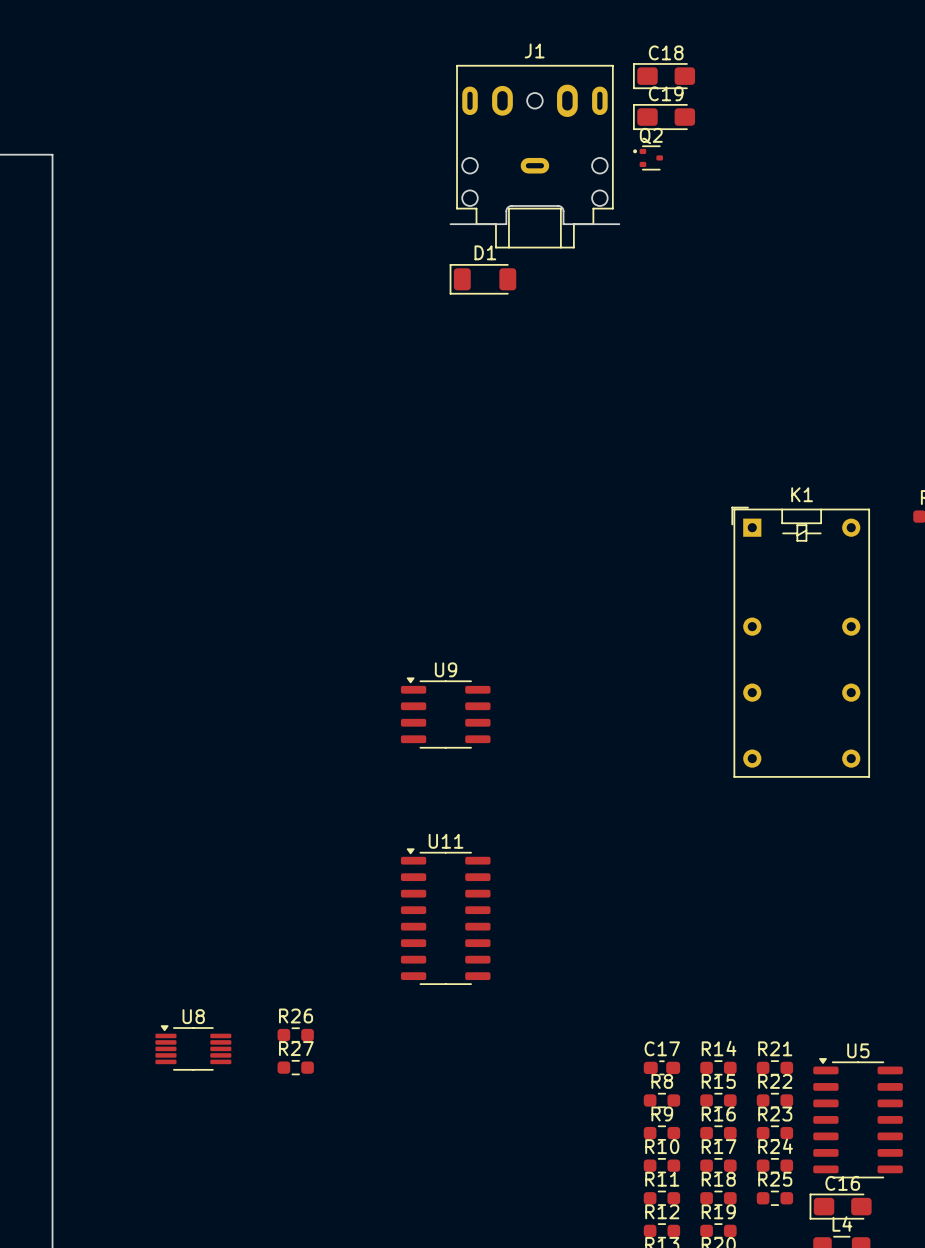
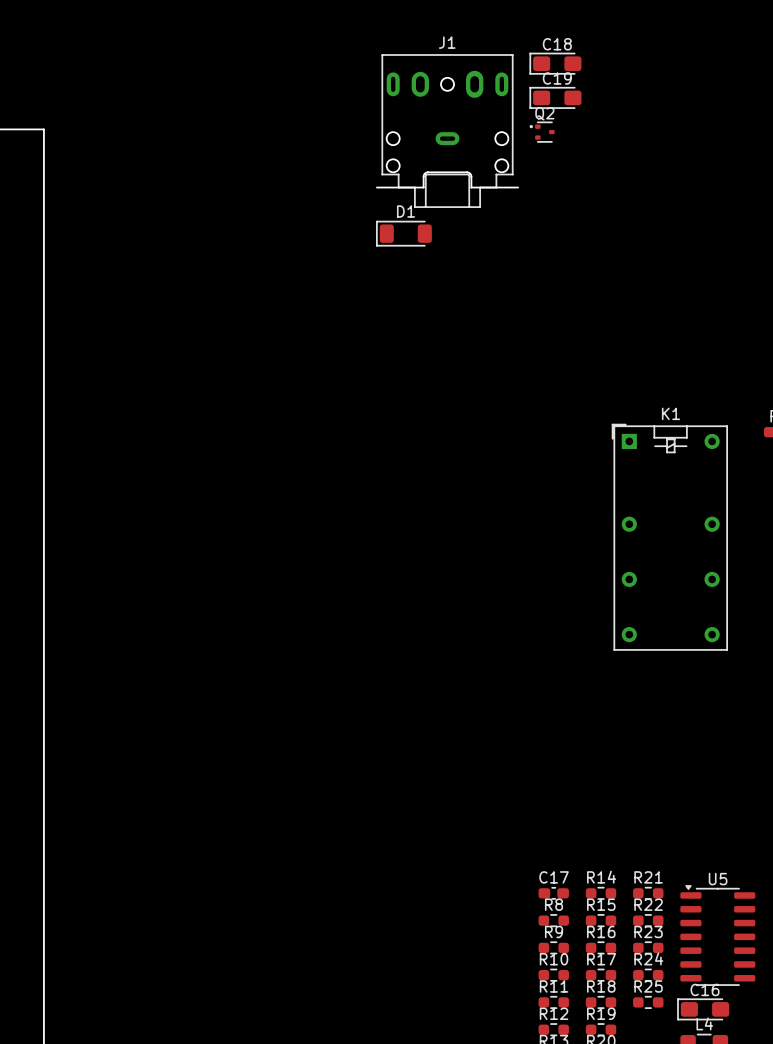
U9: (445, 712) -> none
U11: (445, 916) -> none
R26: (295, 1035) -> none
U8: (193, 1047) -> none
R27: (295, 1067) -> none

